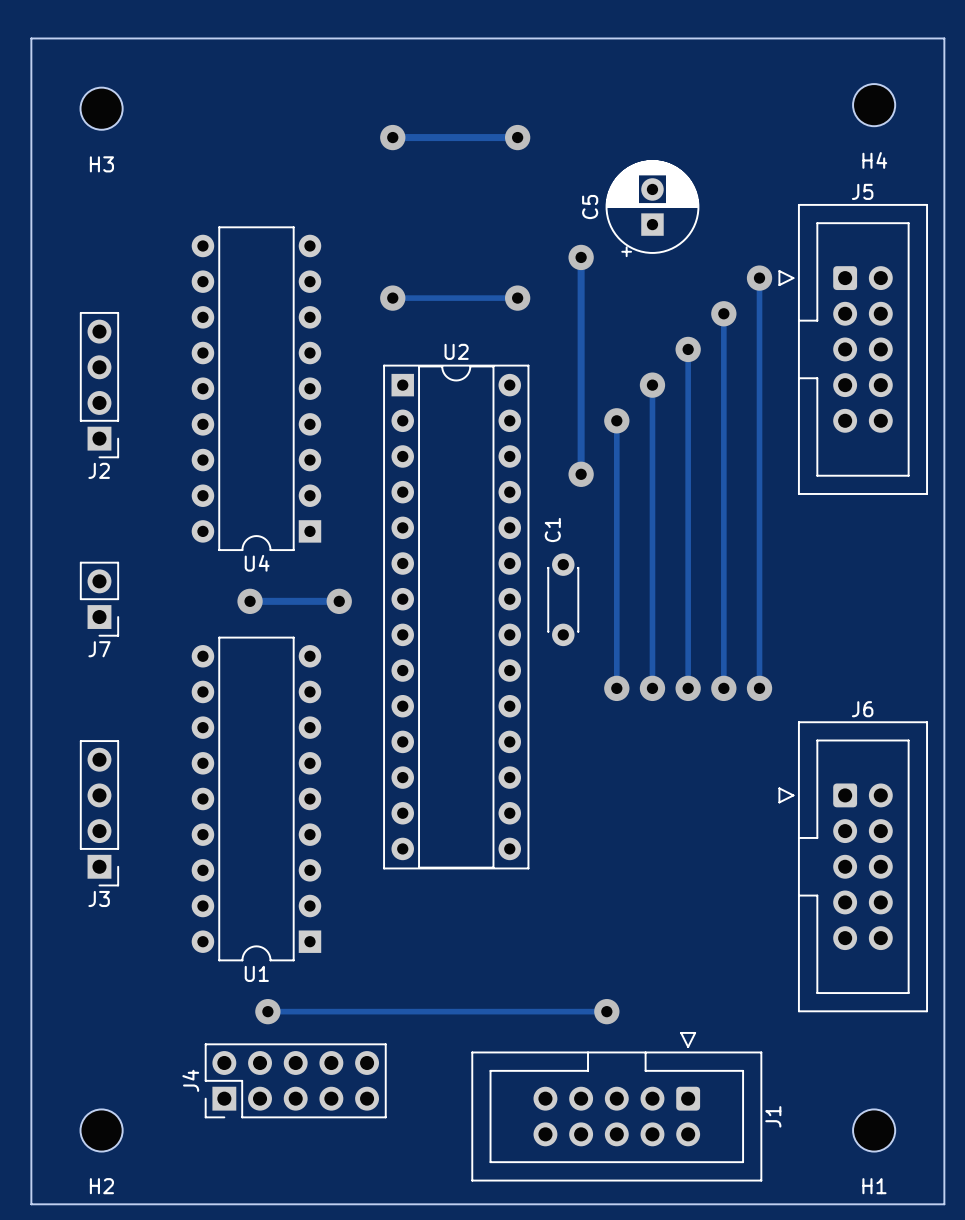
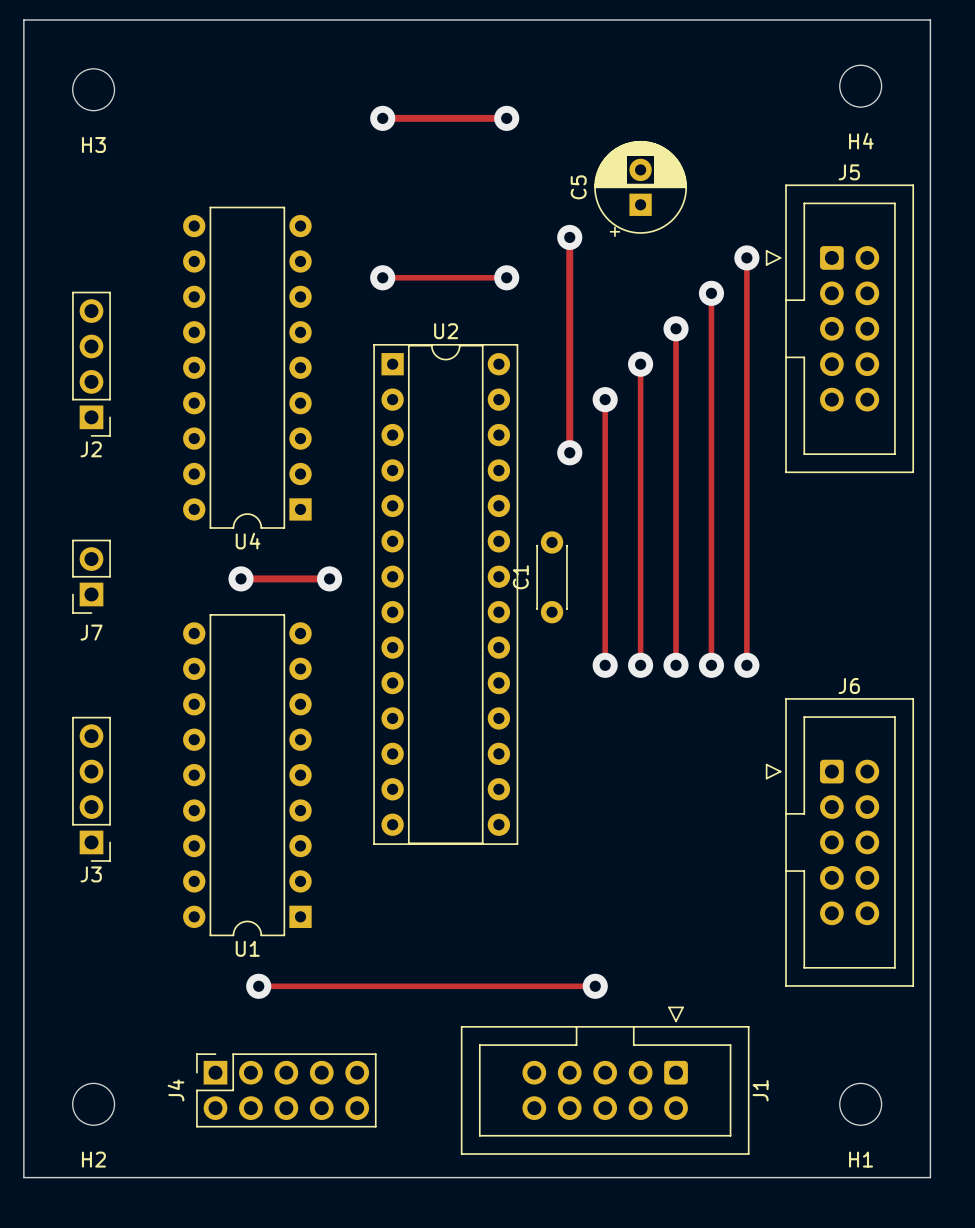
C1 name position: C1 (552, 530) -> C1 (520, 577)
J7 footprint: [79, 561, 120, 637] -> [72, 539, 111, 614]
J4 footprint: [204, 1043, 387, 1119] -> [196, 1053, 377, 1128]

